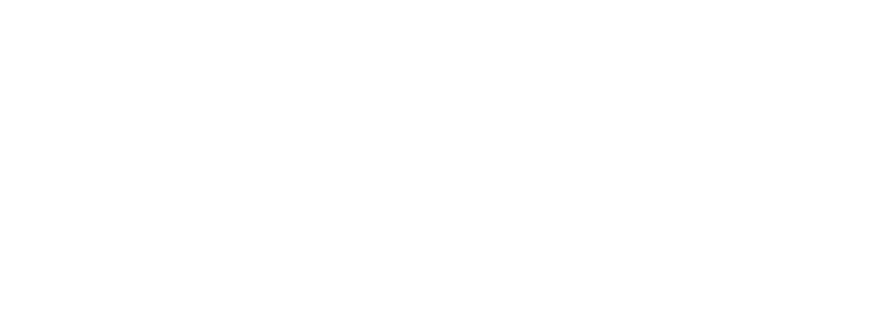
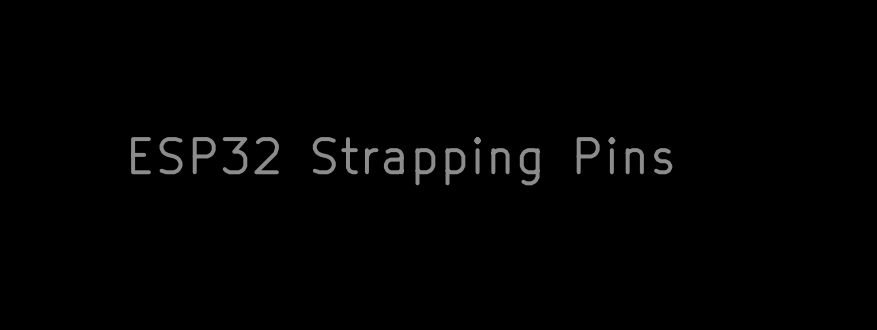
text: none -> ESP32 Strapping Pins (401, 161)

